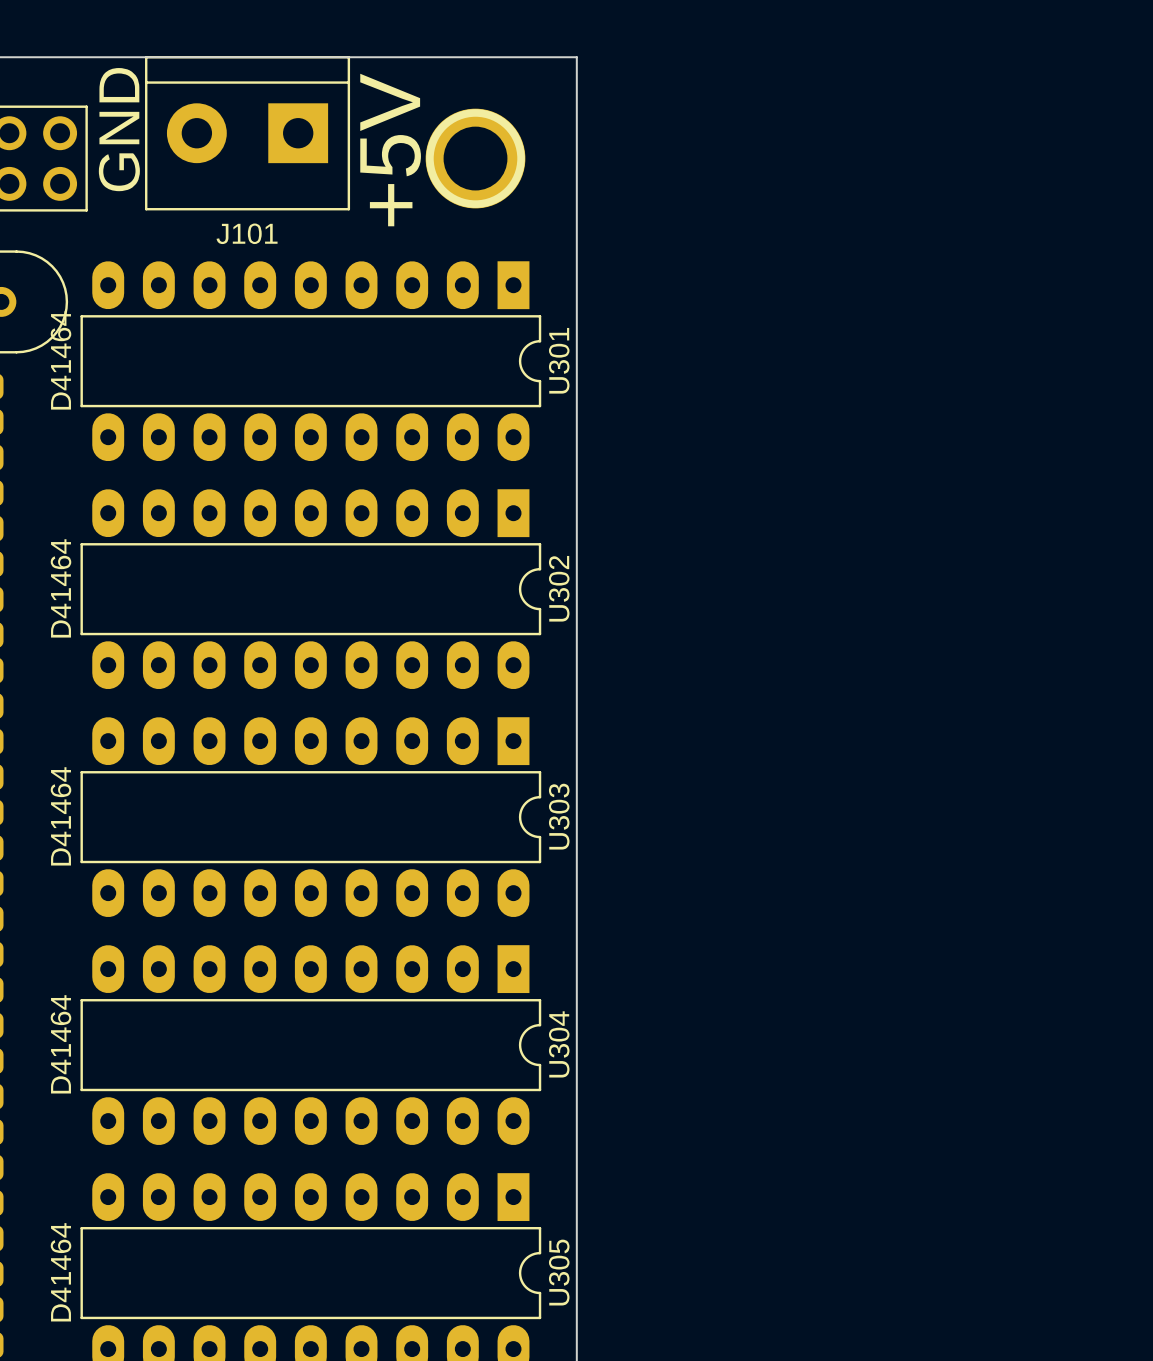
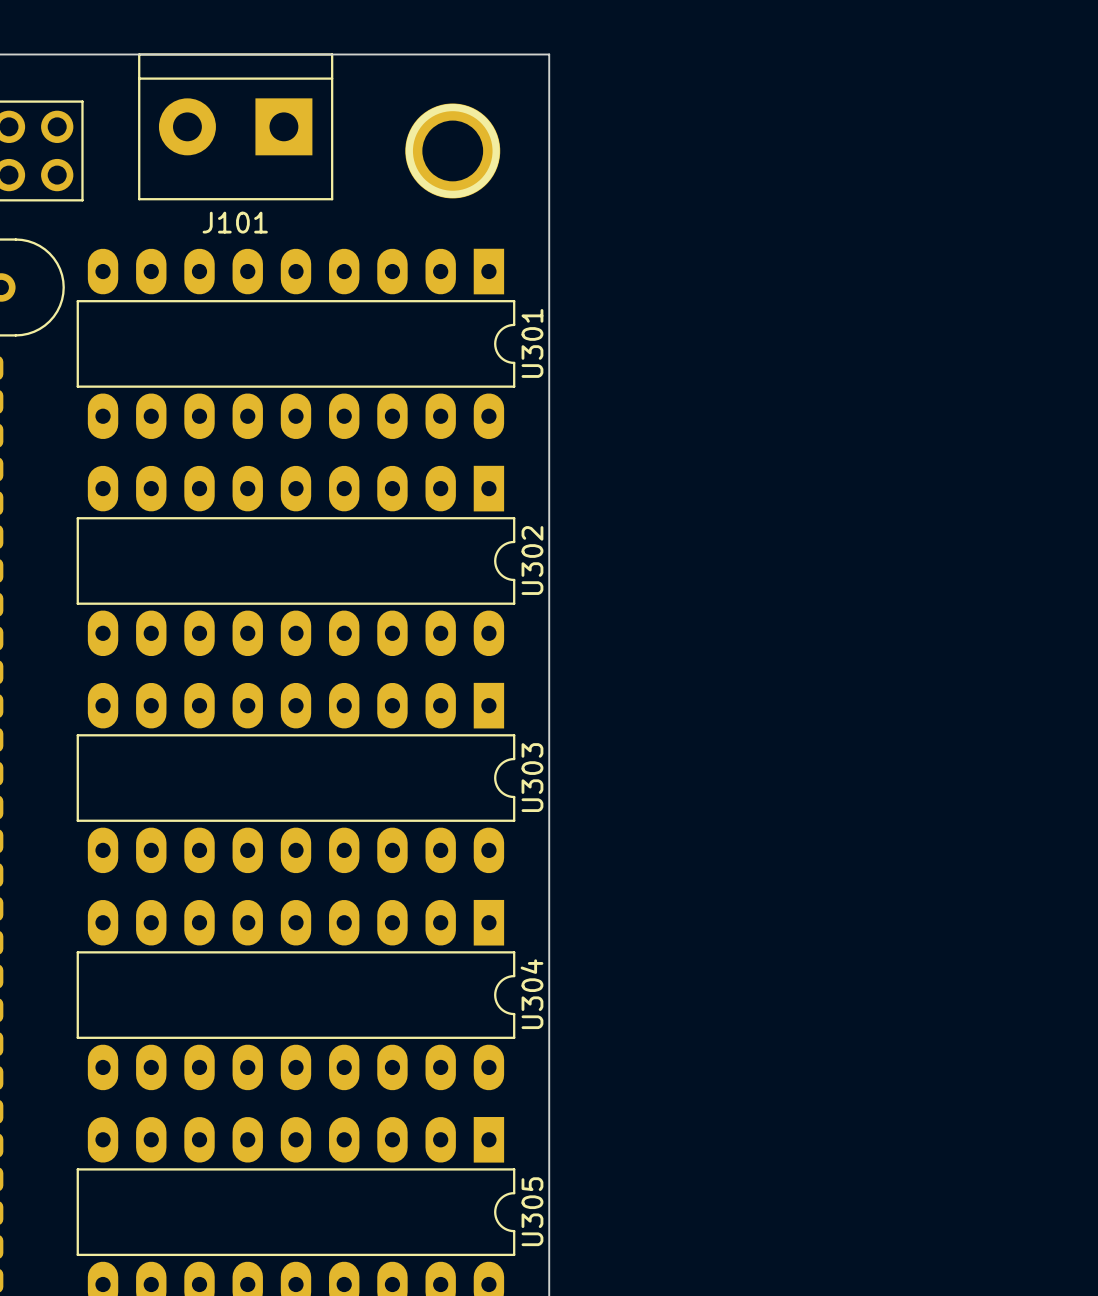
text: GND (119, 129) -> none
text: +5V (390, 150) -> none
U301 value: D41464 (60, 360) -> none
U302 value: D41464 (60, 588) -> none
U303 value: D41464 (60, 816) -> none
U304 value: D41464 (60, 1044) -> none
U305 value: D41464 (60, 1272) -> none

